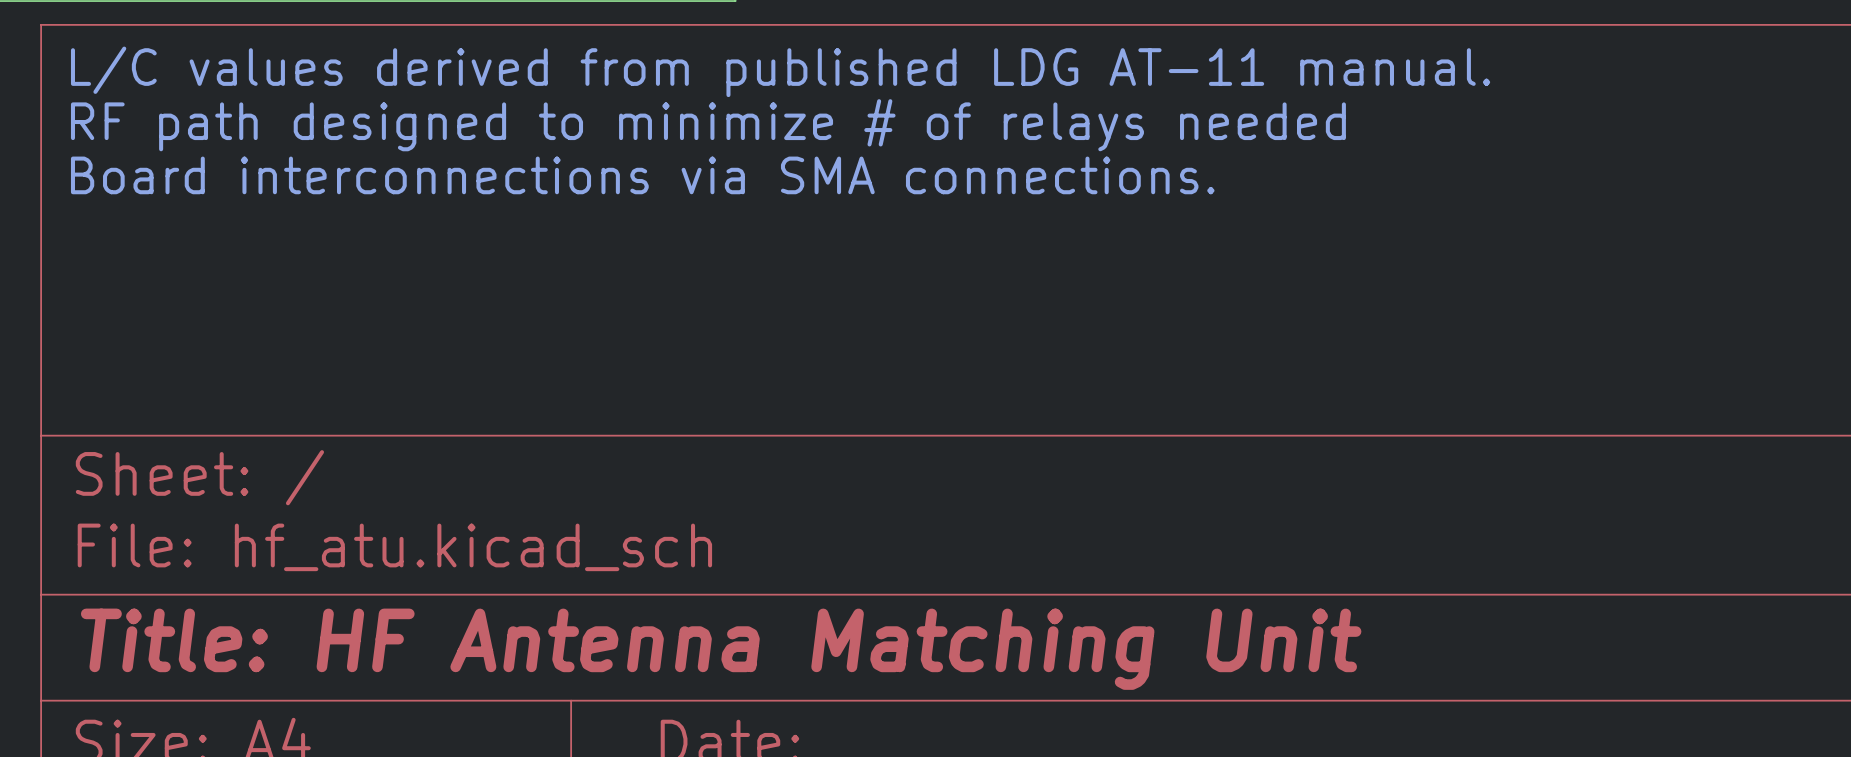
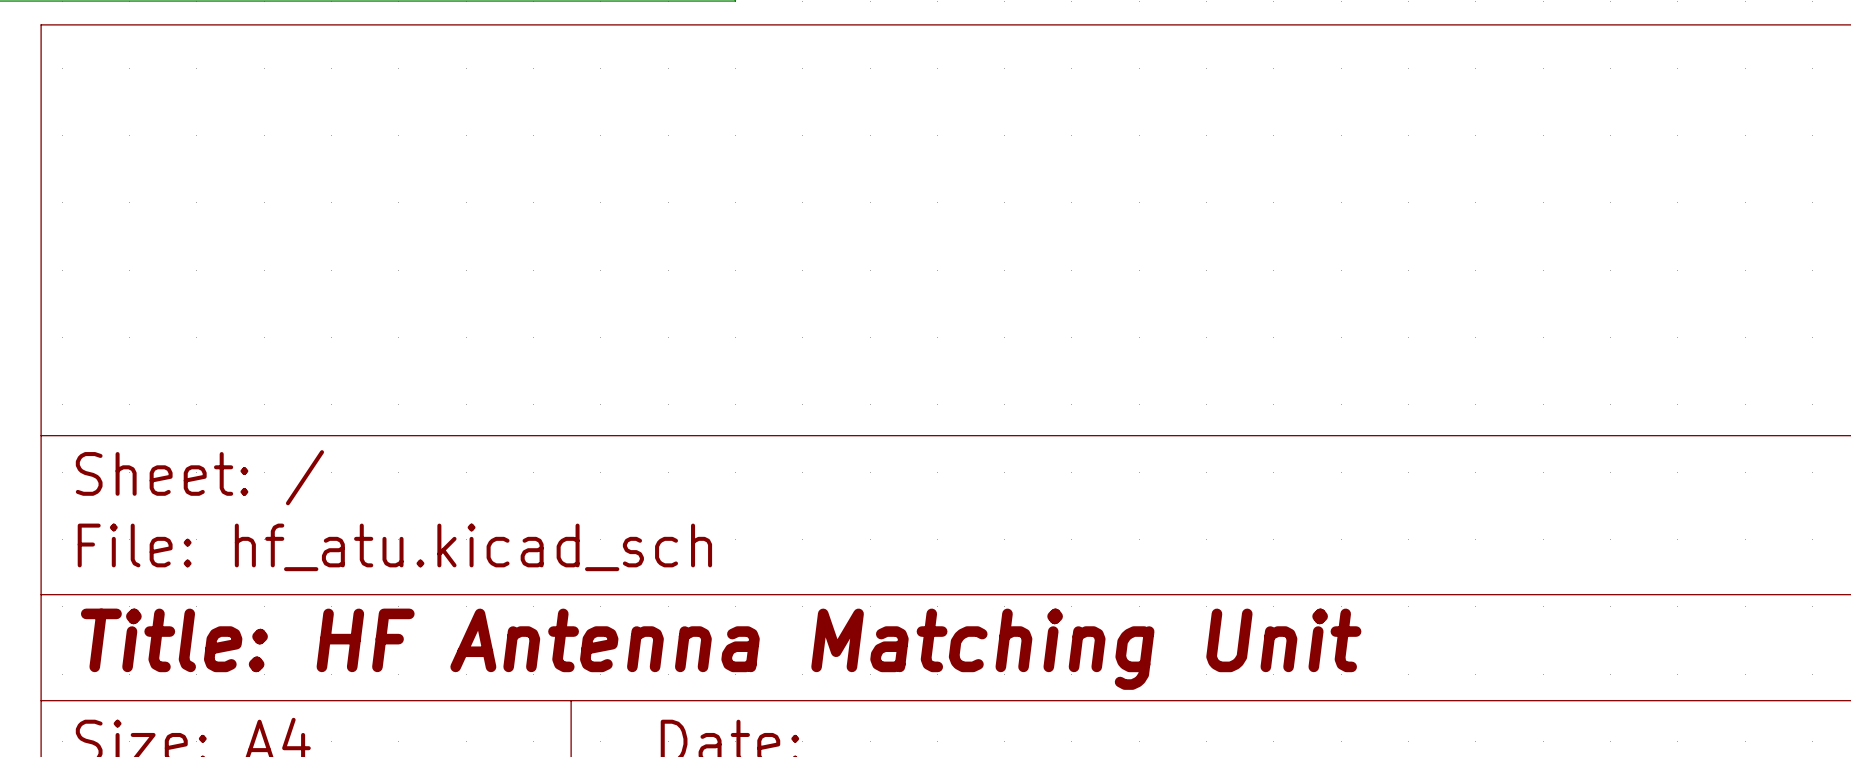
text: L/C values derived from published LDG AT-11 manual. (780, 71) -> none
text: RF path designed to minimize # of relays needed (708, 125) -> none
text: Board interconnections via SMA connections. (642, 175) -> none

